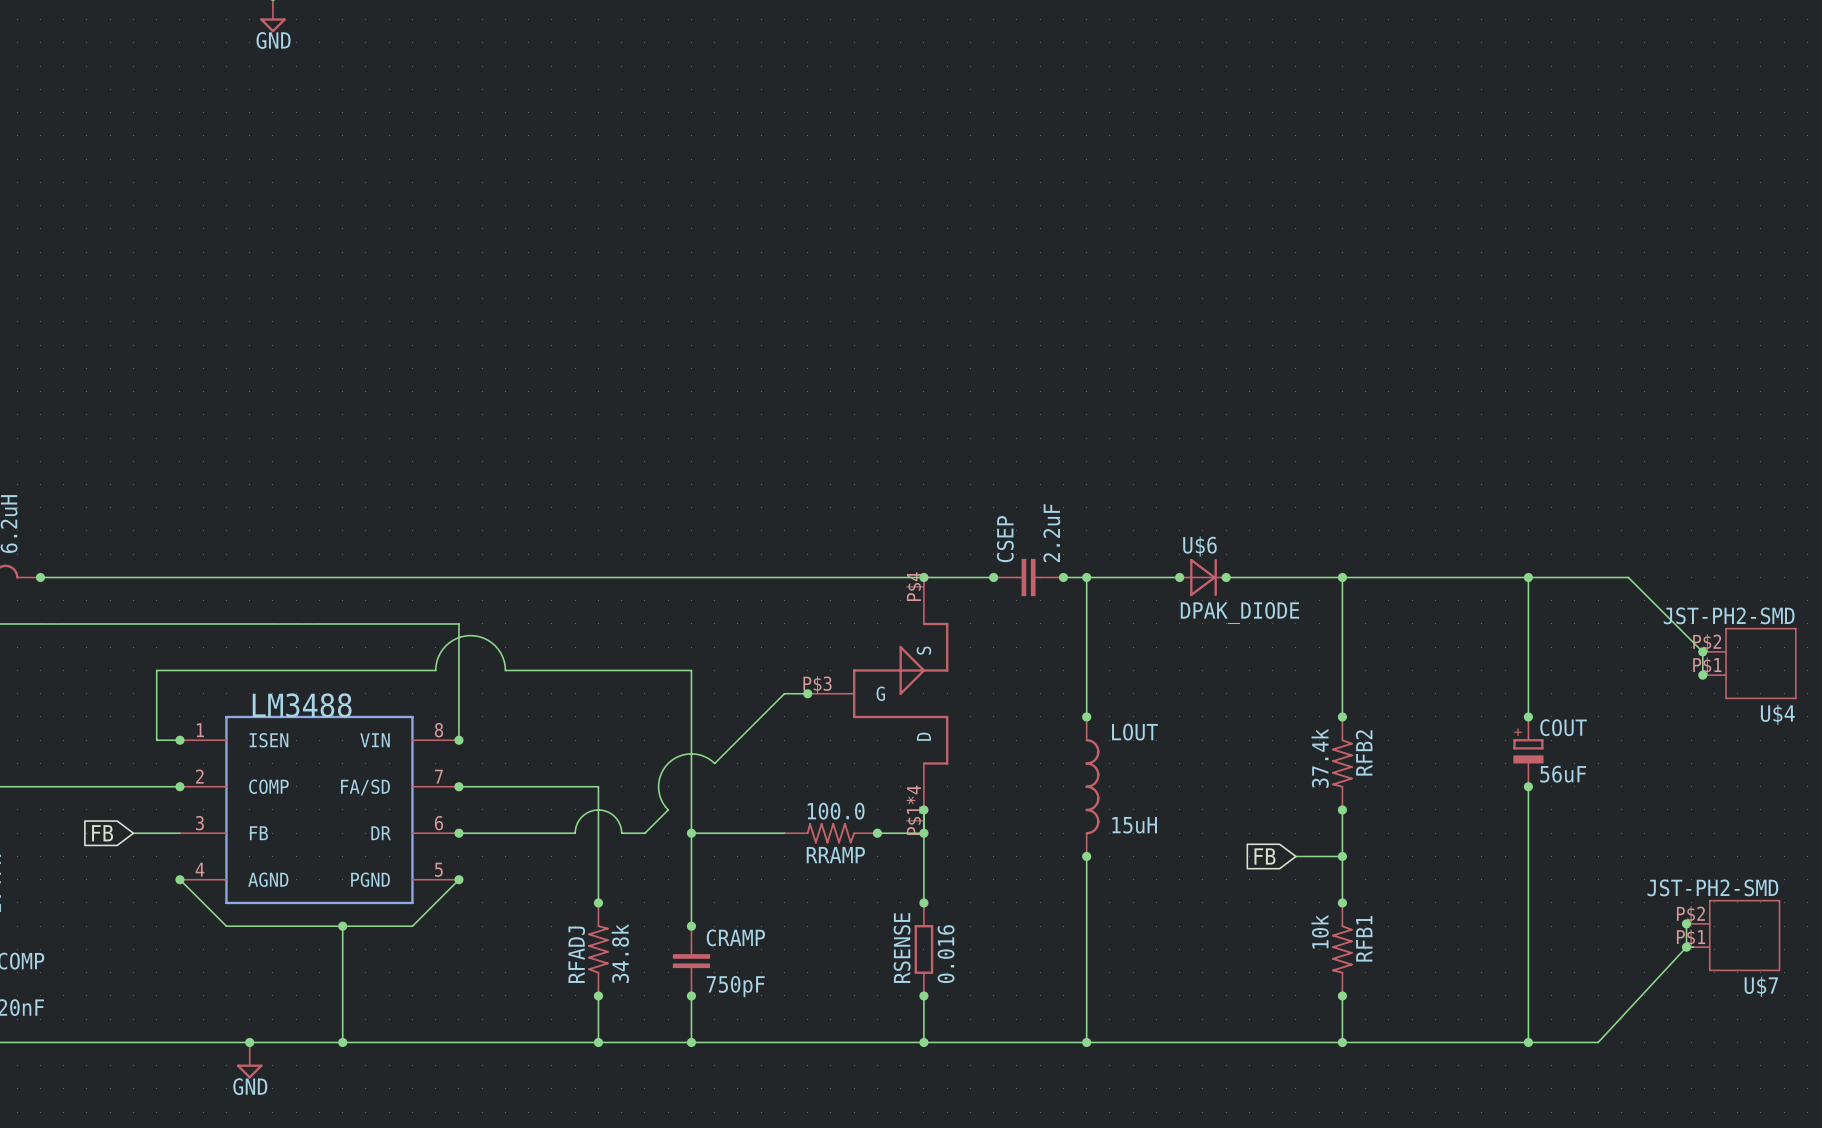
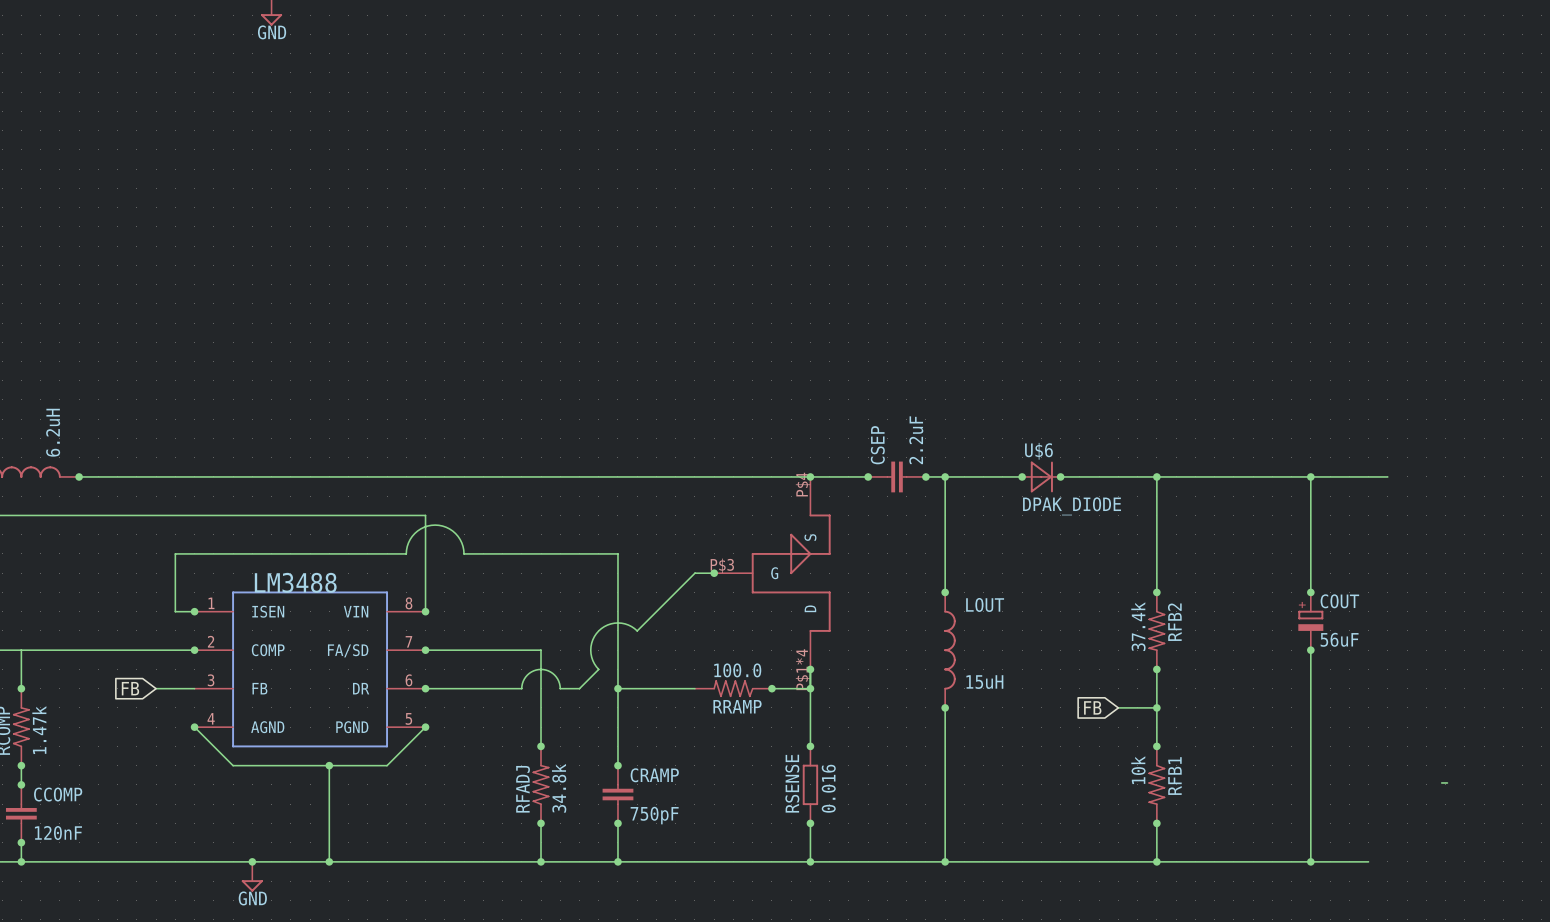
wire: (1621, 577) (1628, 577) (1702, 651) (1702, 675) -> none
junction: (1702, 651) -> none
U$4: JST-PH2-SMD (1749, 663) -> none
junction: (1702, 675) -> none
wire: (1686, 923) (1686, 947) (1598, 1042) -> none
junction: (1686, 923) -> none
U$7: JST-PH2-SMD (1733, 935) -> none
junction: (1686, 947) -> none

